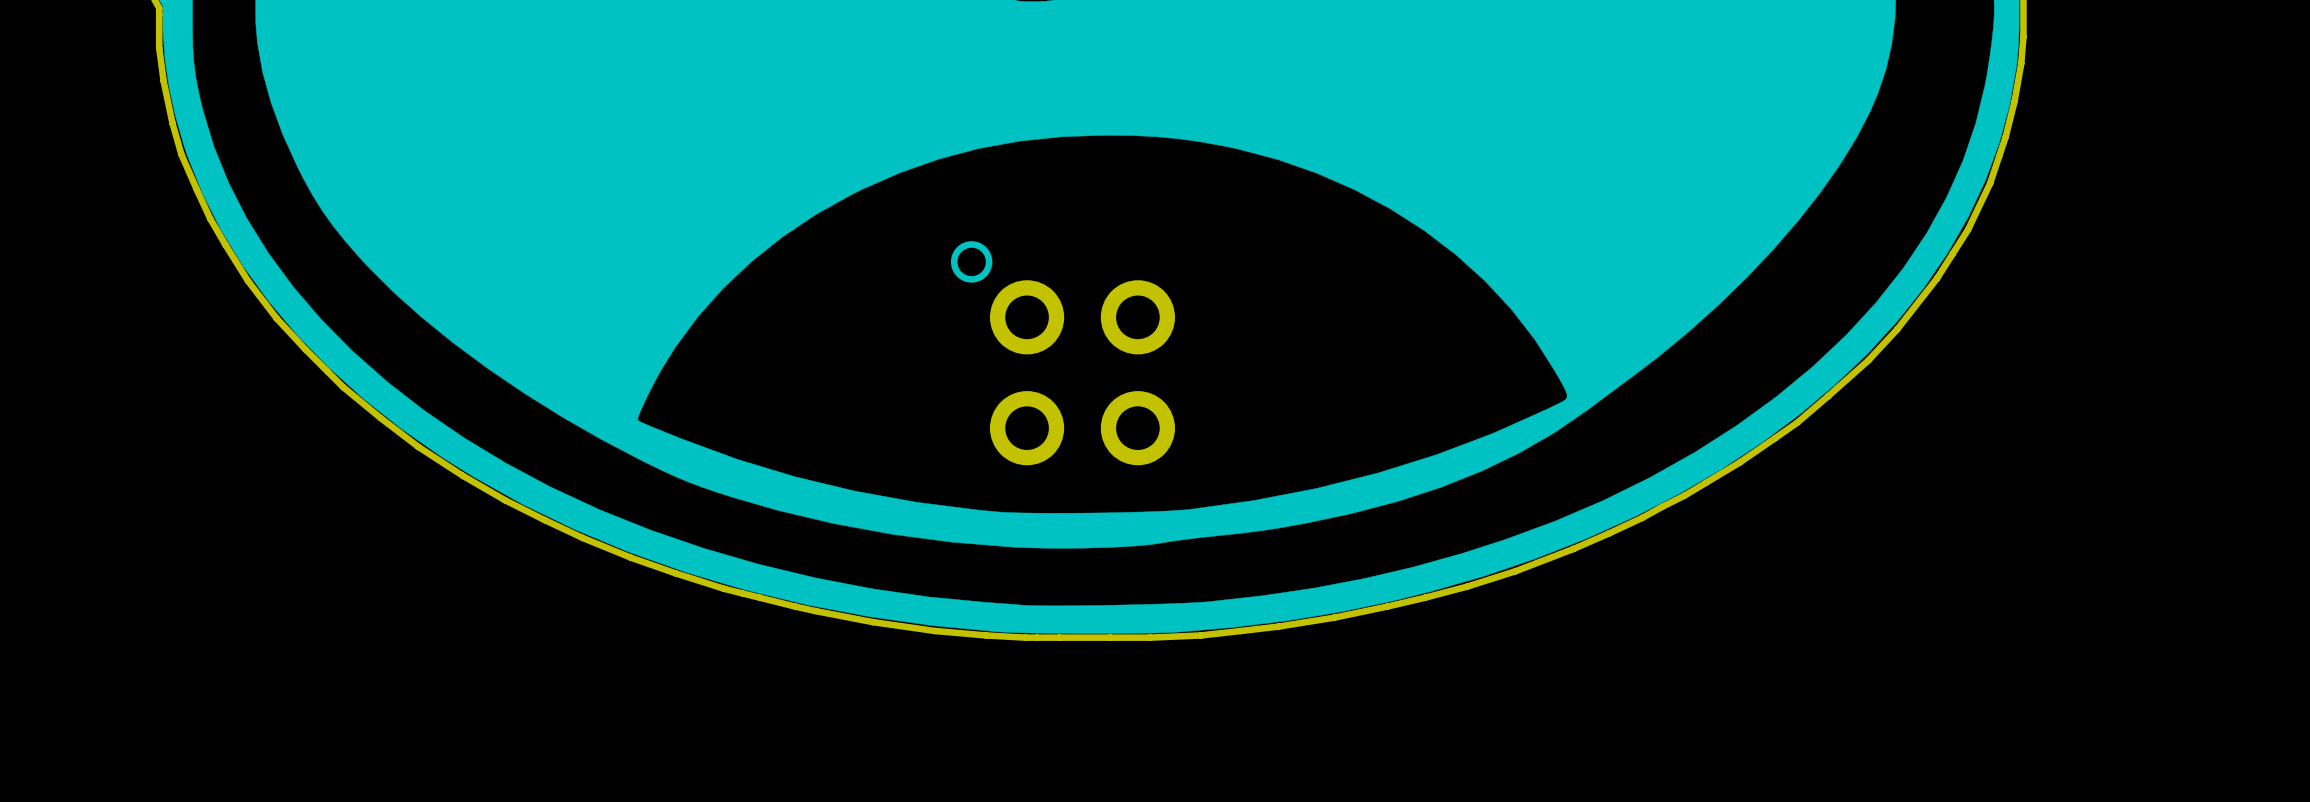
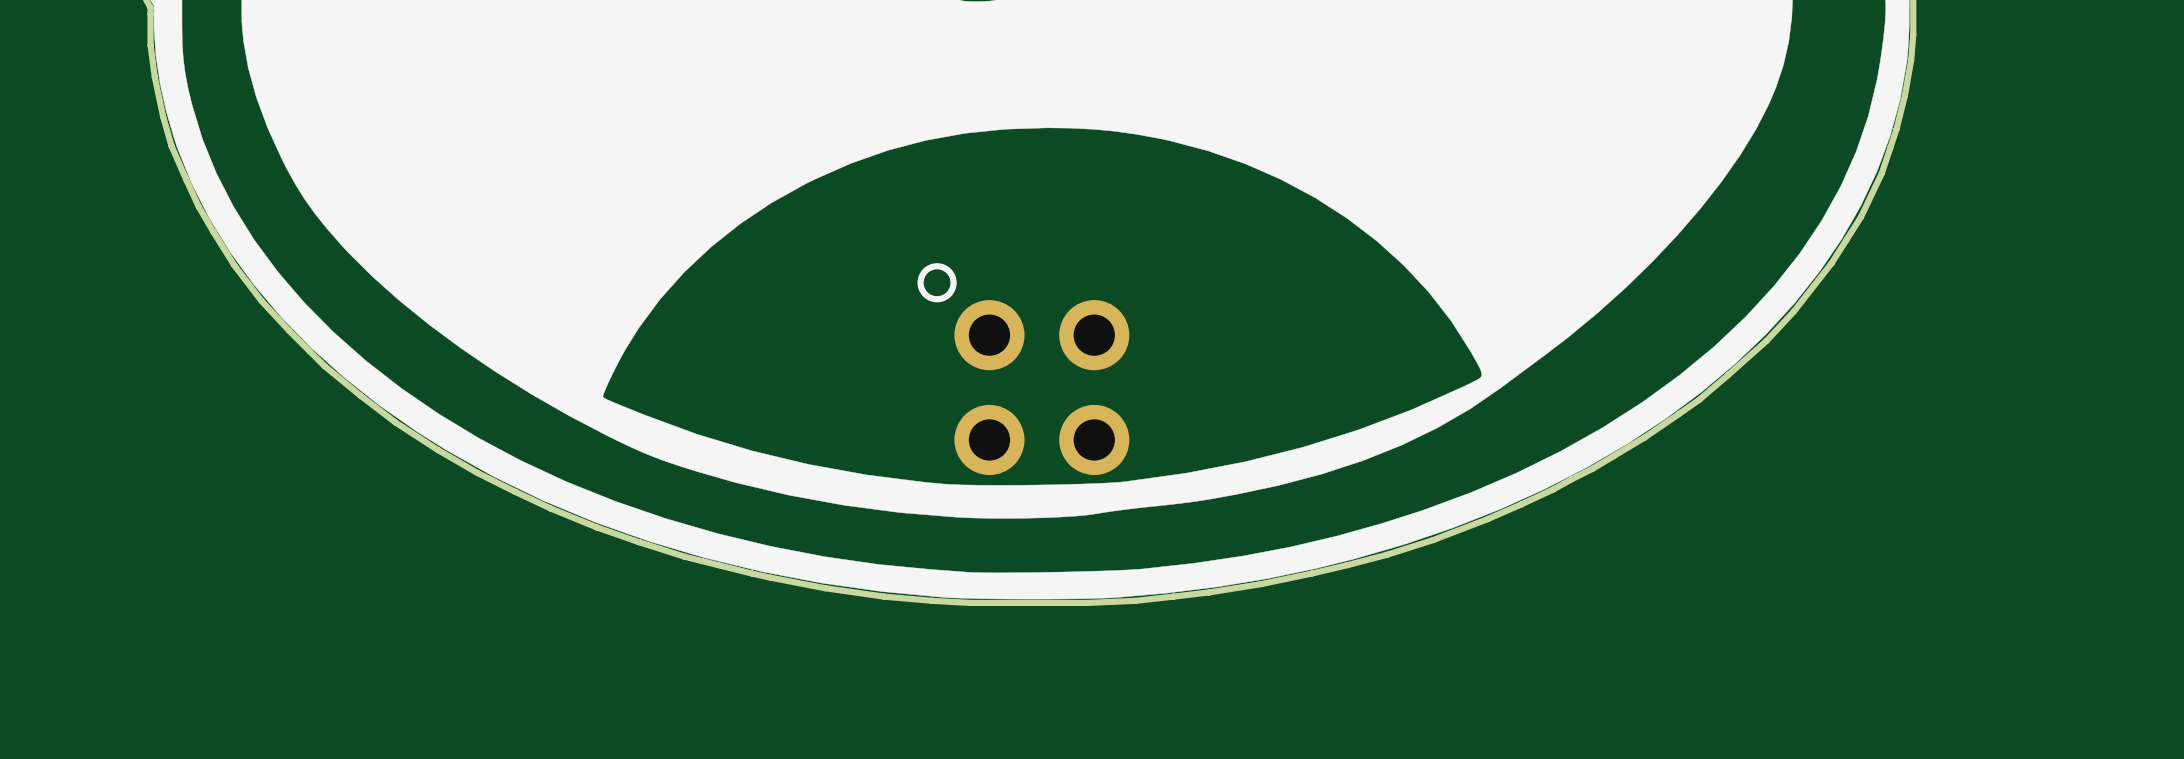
part position: (1062, 353) -> (1023, 369)

